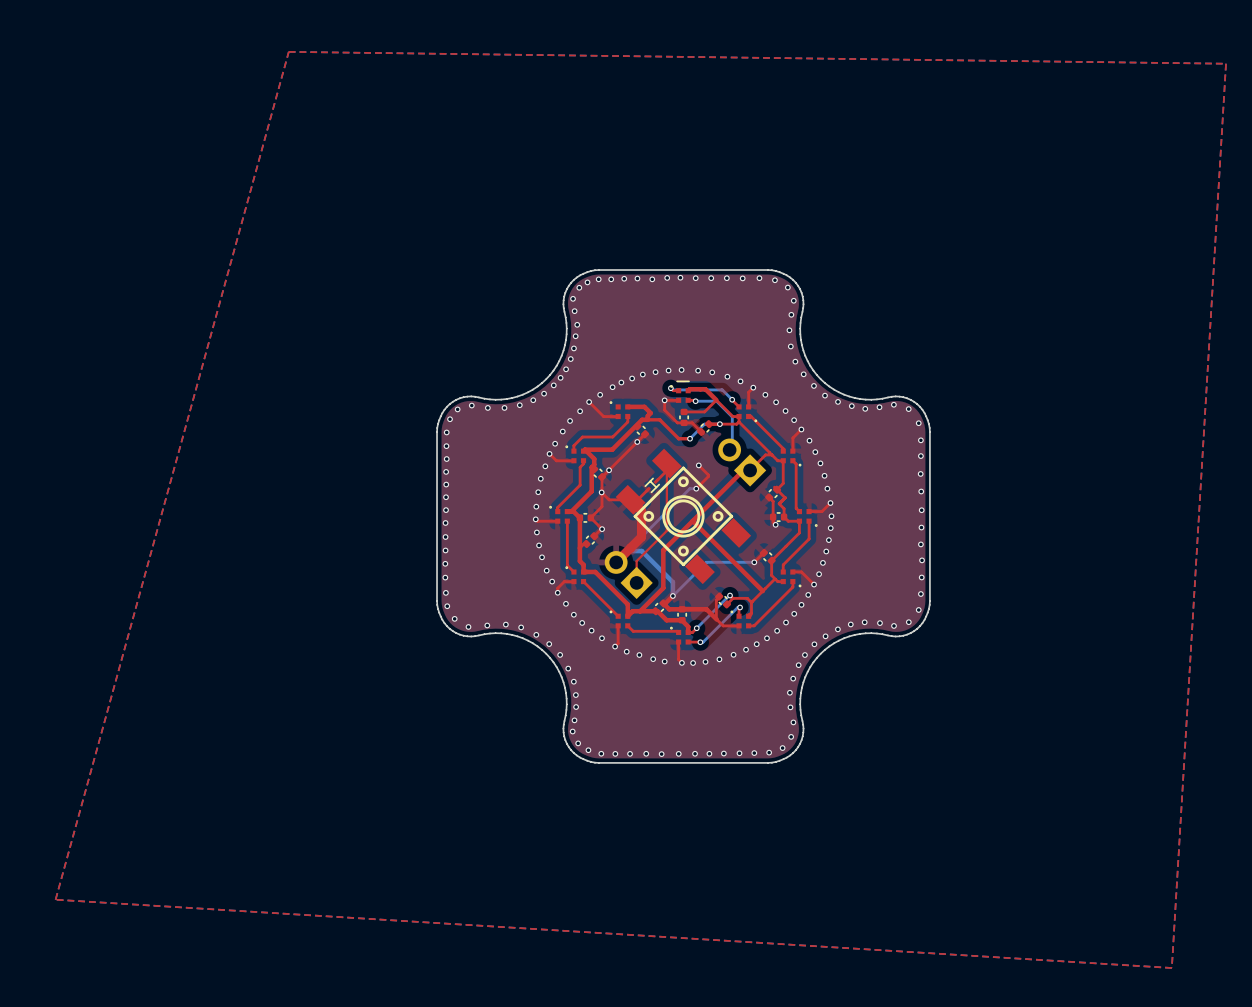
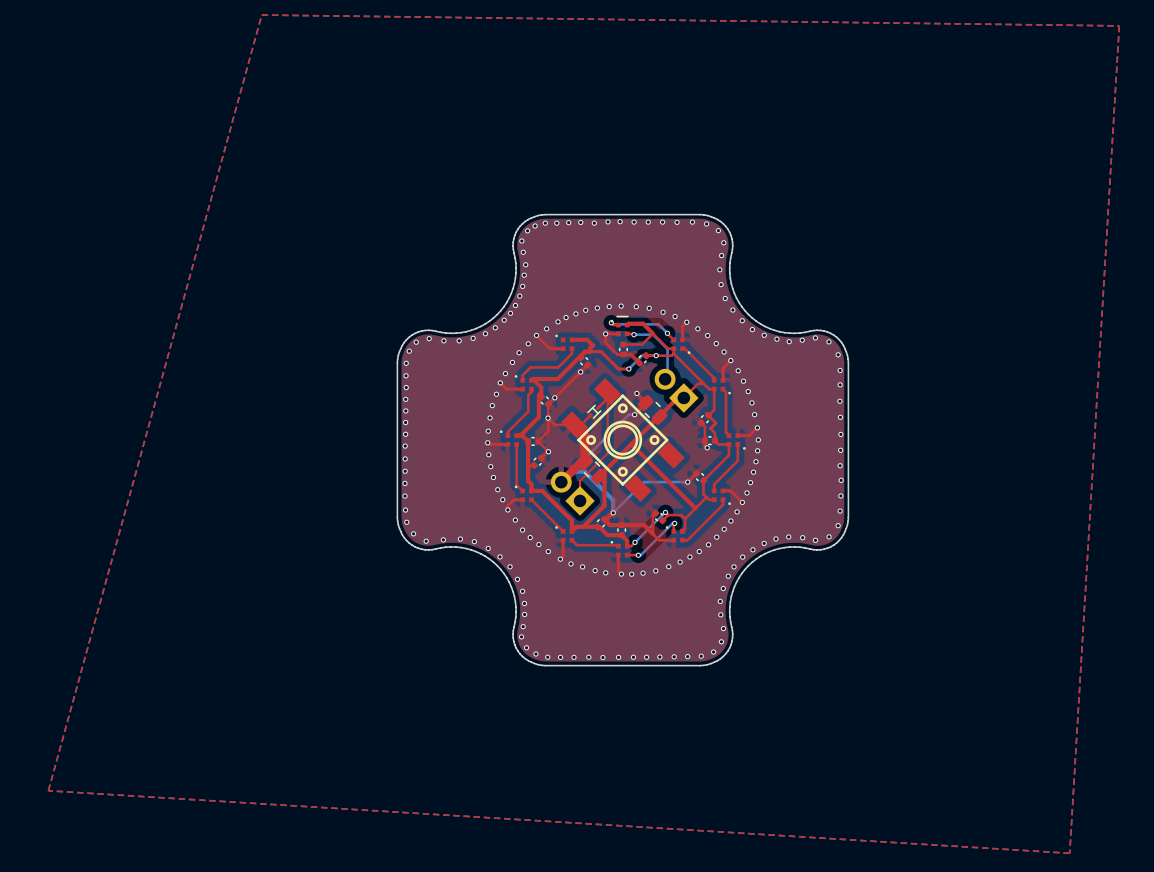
part: none -> (652, 409)
part: none -> (592, 469)

